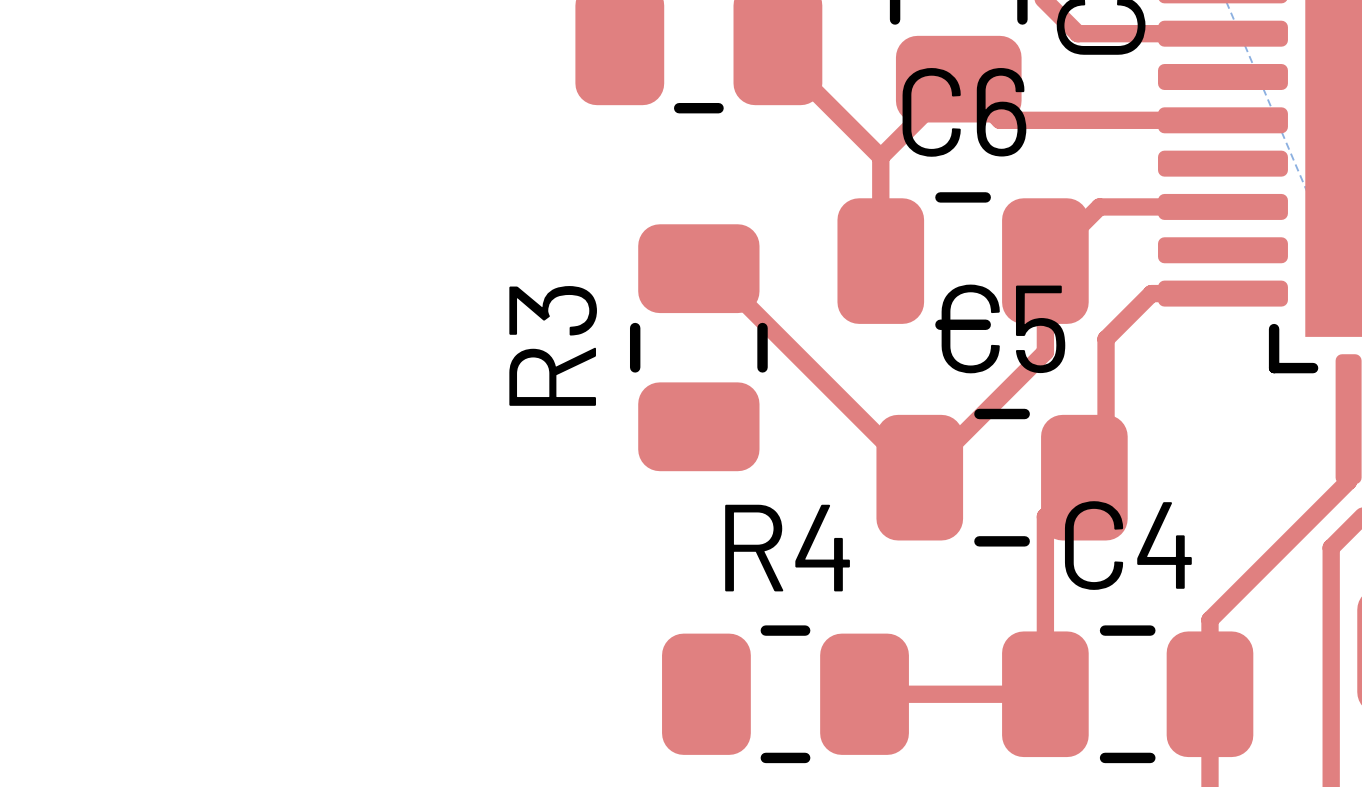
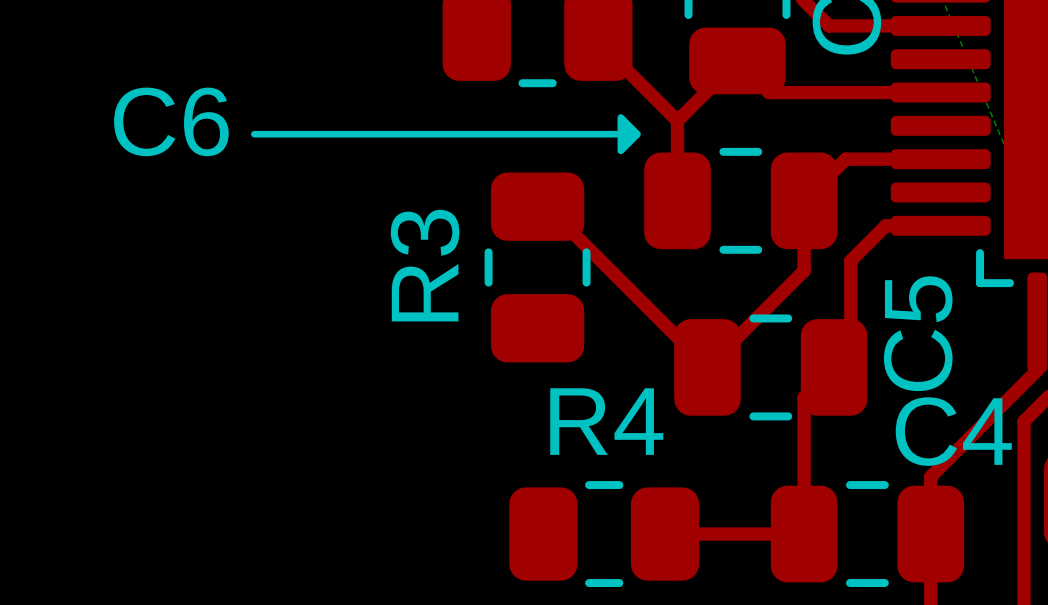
C6 name position: C6 (964, 112) -> C6 (171, 121)
drawing: none -> [617, 114, 641, 155]
line: none -> (254, 134) (620, 134)
C5 name rotation: 0° (1003, 328) -> 90° counterclockwise (918, 333)
C5 name position: C5 (1003, 328) -> C5 (918, 333)
C4 name position: C4 (1128, 545) -> C4 (953, 431)

